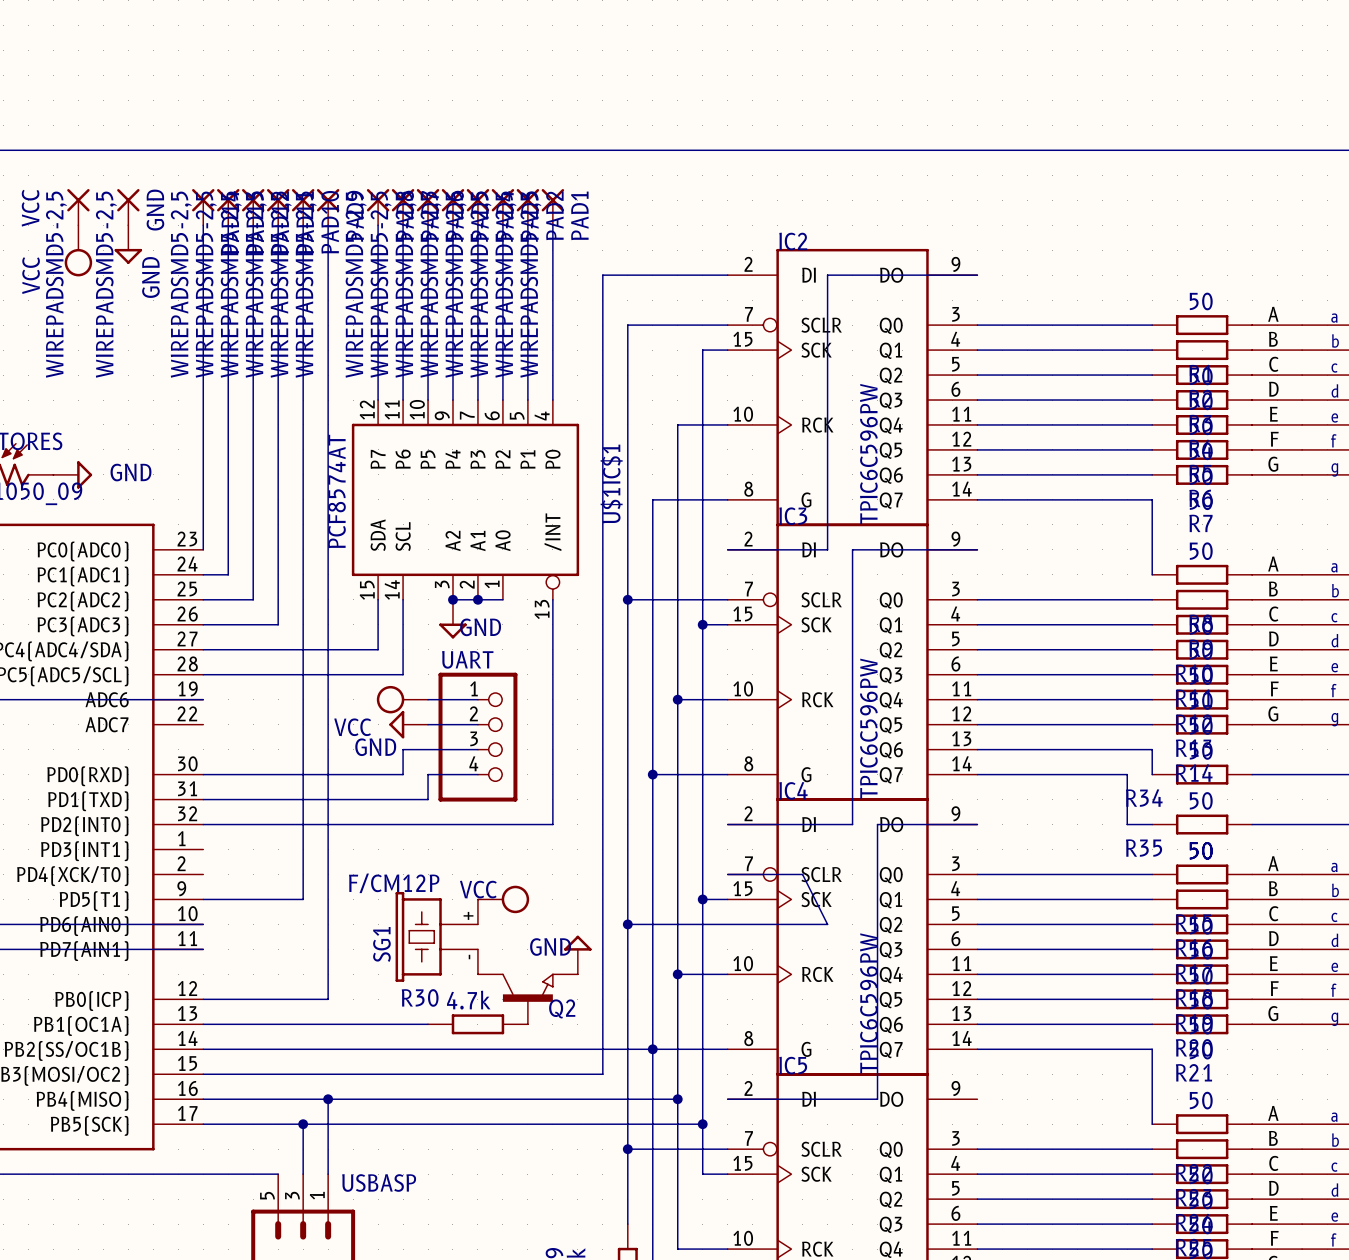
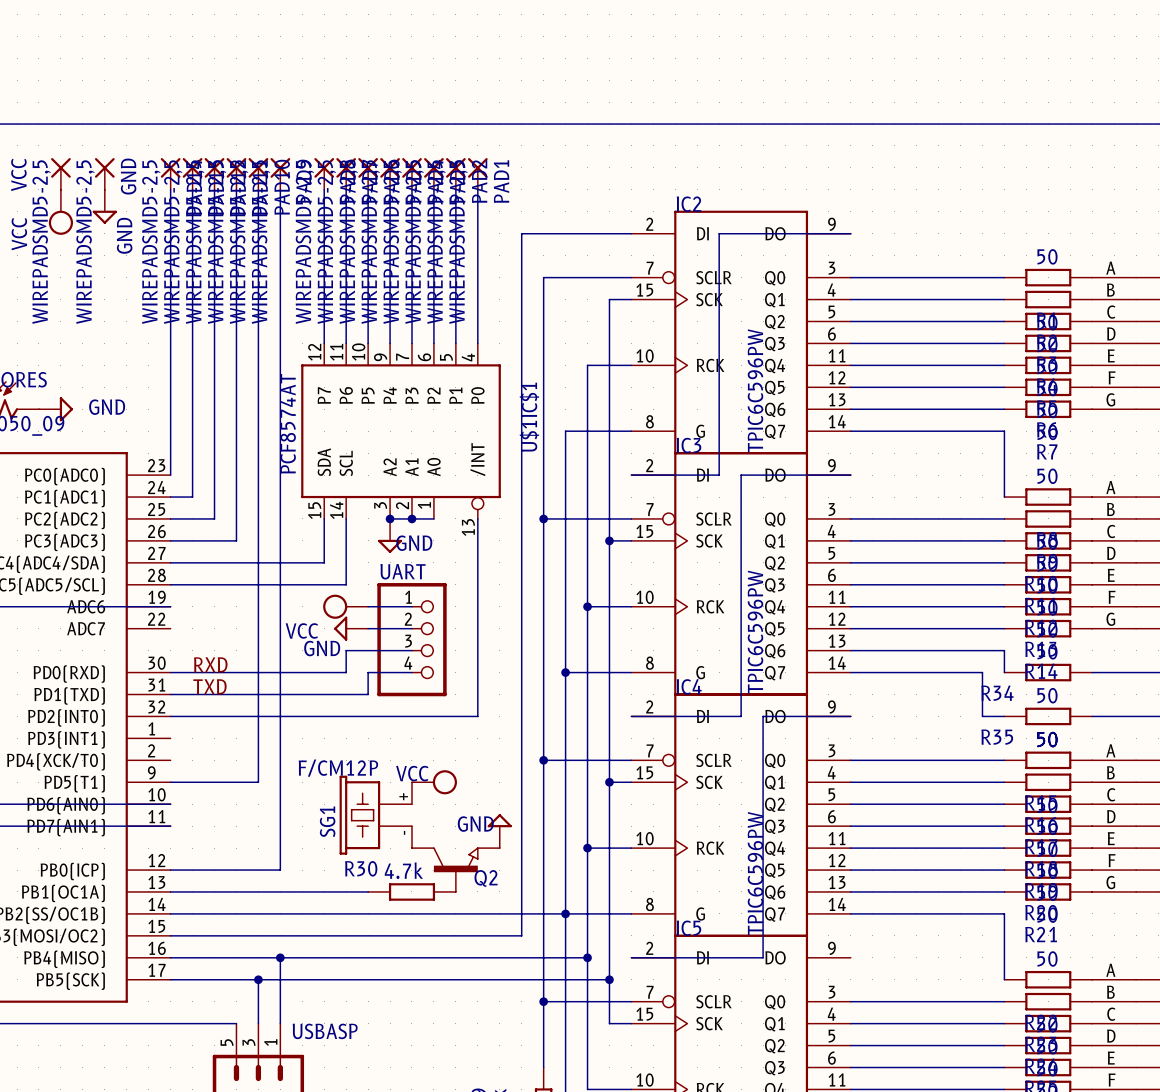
label: none -> RXD (210, 664)
label: none -> TXD (209, 686)
wire: (727, 874) (802, 874) (827, 924) (627, 924) -> (631, 760) (543, 760)
junction position: (627, 924) -> (543, 760)

